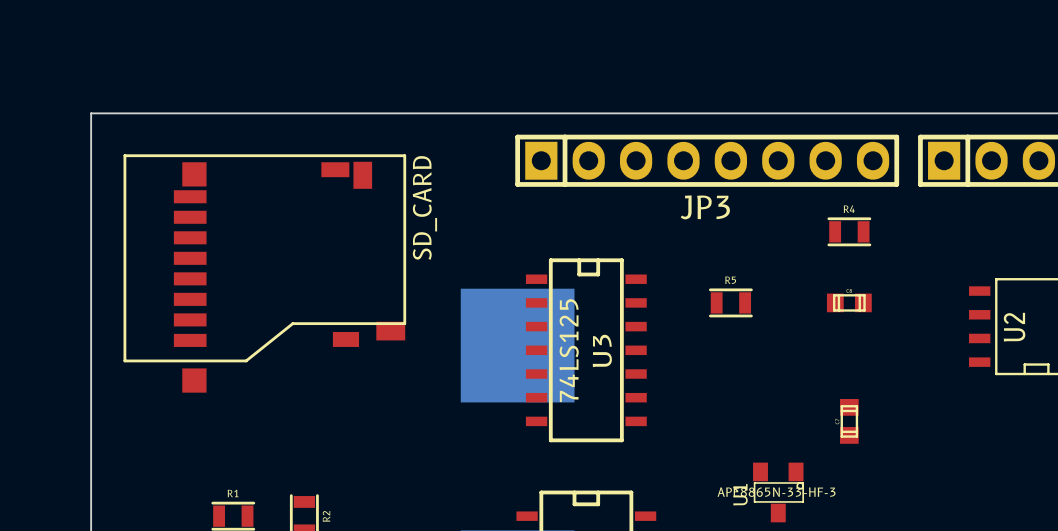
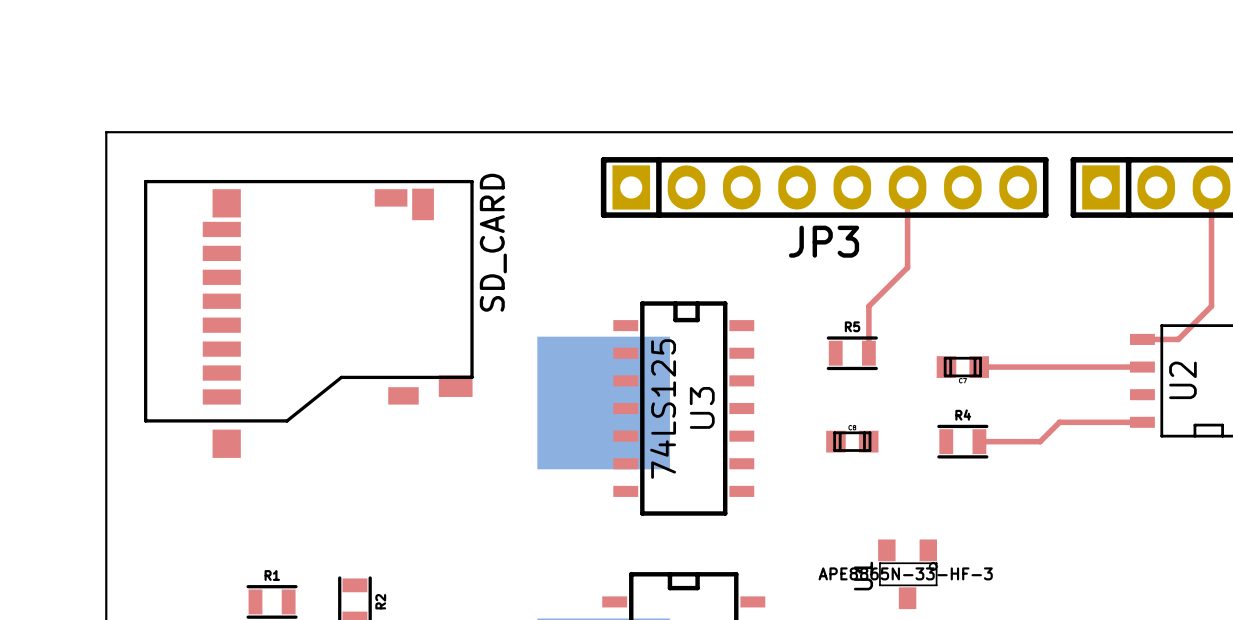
top track: none -> (907, 187) (907, 267) (868, 306) (868, 353)
top track: none -> (1211, 187) (1211, 306) (1178, 339) (1142, 339)
R4 position: (849, 231) -> (962, 441)
part position: (849, 302) -> (852, 441)
top track: none -> (979, 367) (1142, 367)
top track: none -> (1142, 422) (1059, 422) (1040, 441) (979, 441)
part rotation: 0° (849, 421) -> 90° counterclockwise (962, 367)
part position: (849, 421) -> (962, 367)

